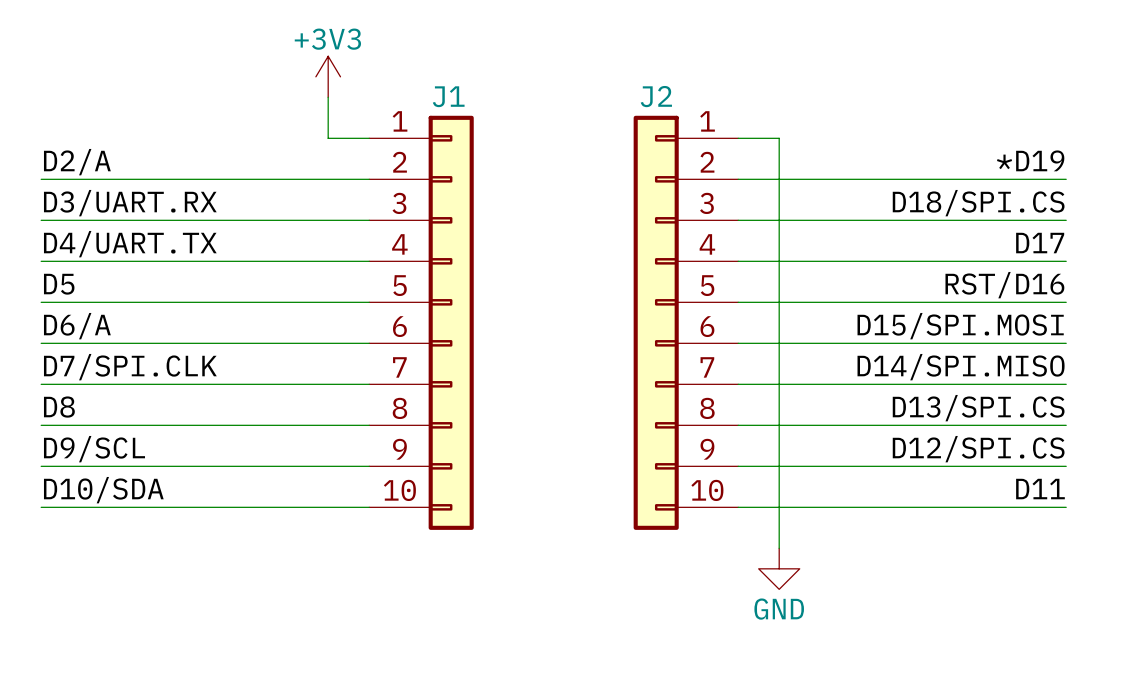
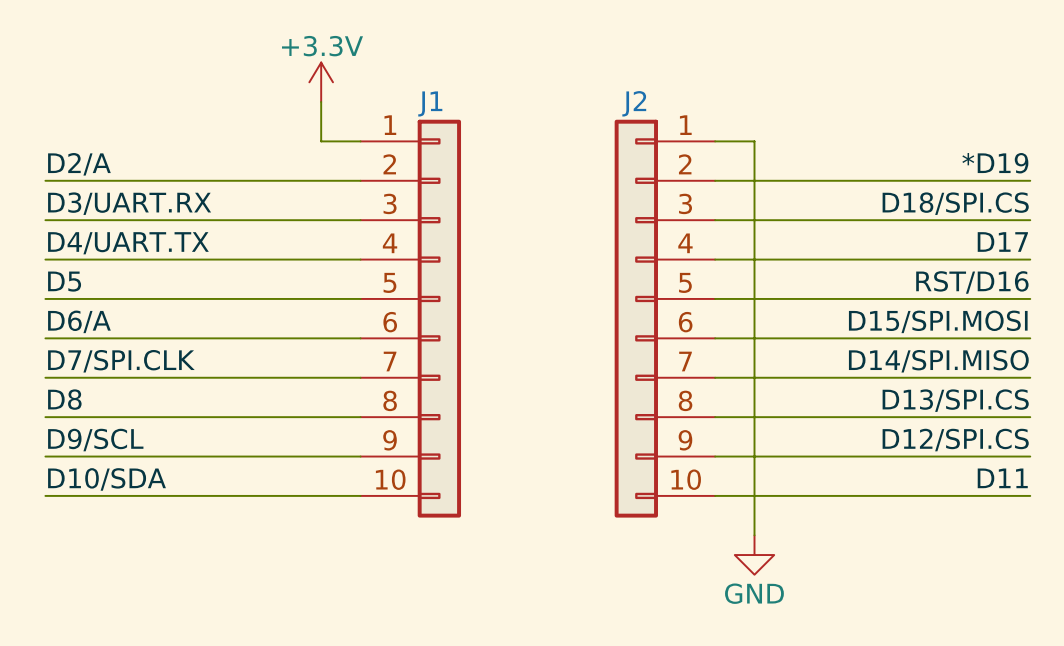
power symbol: +3V3 (328, 76) -> +3.3V (321, 82)

